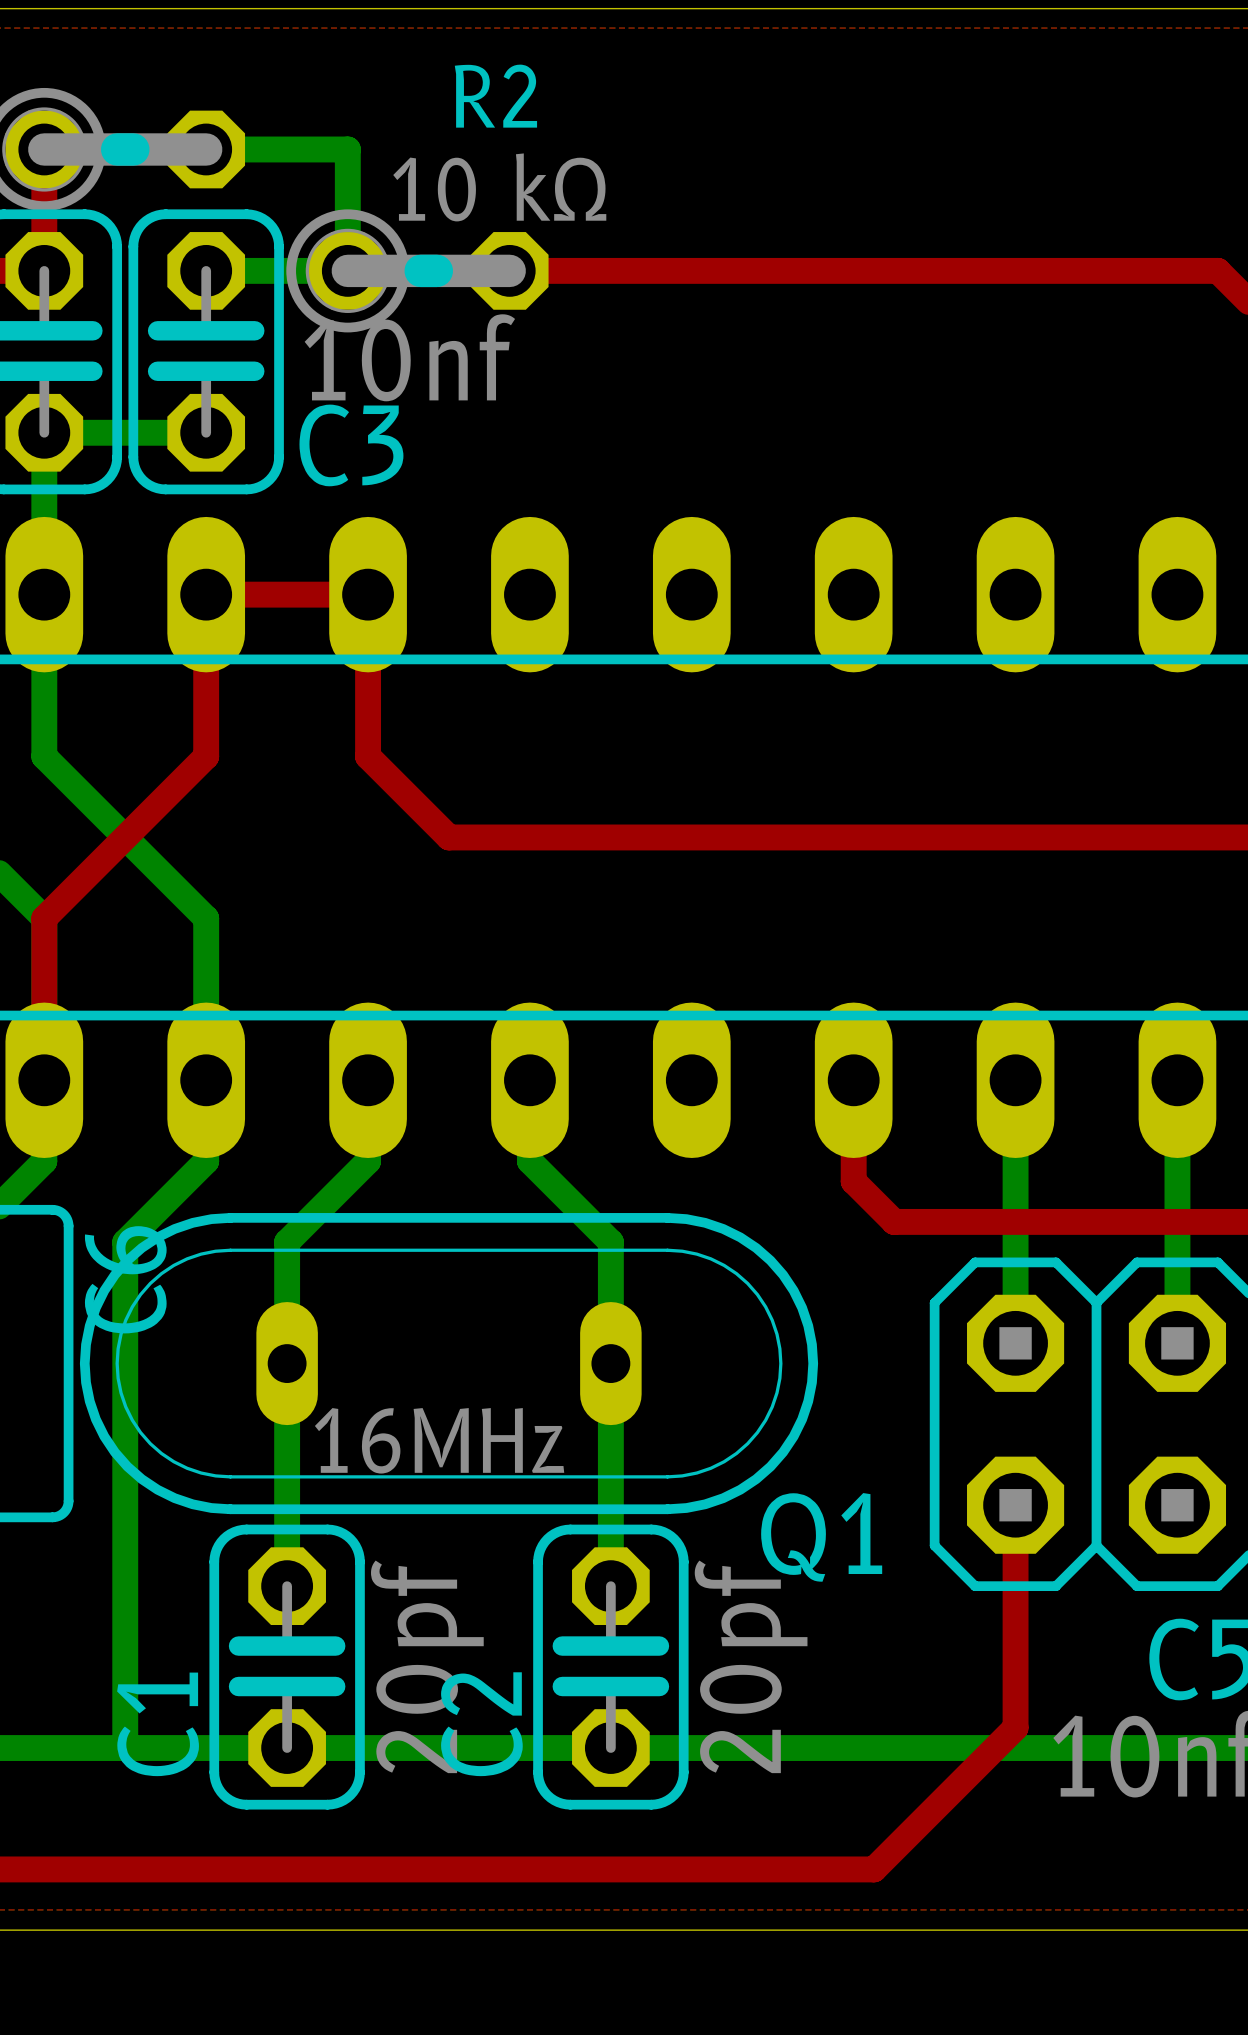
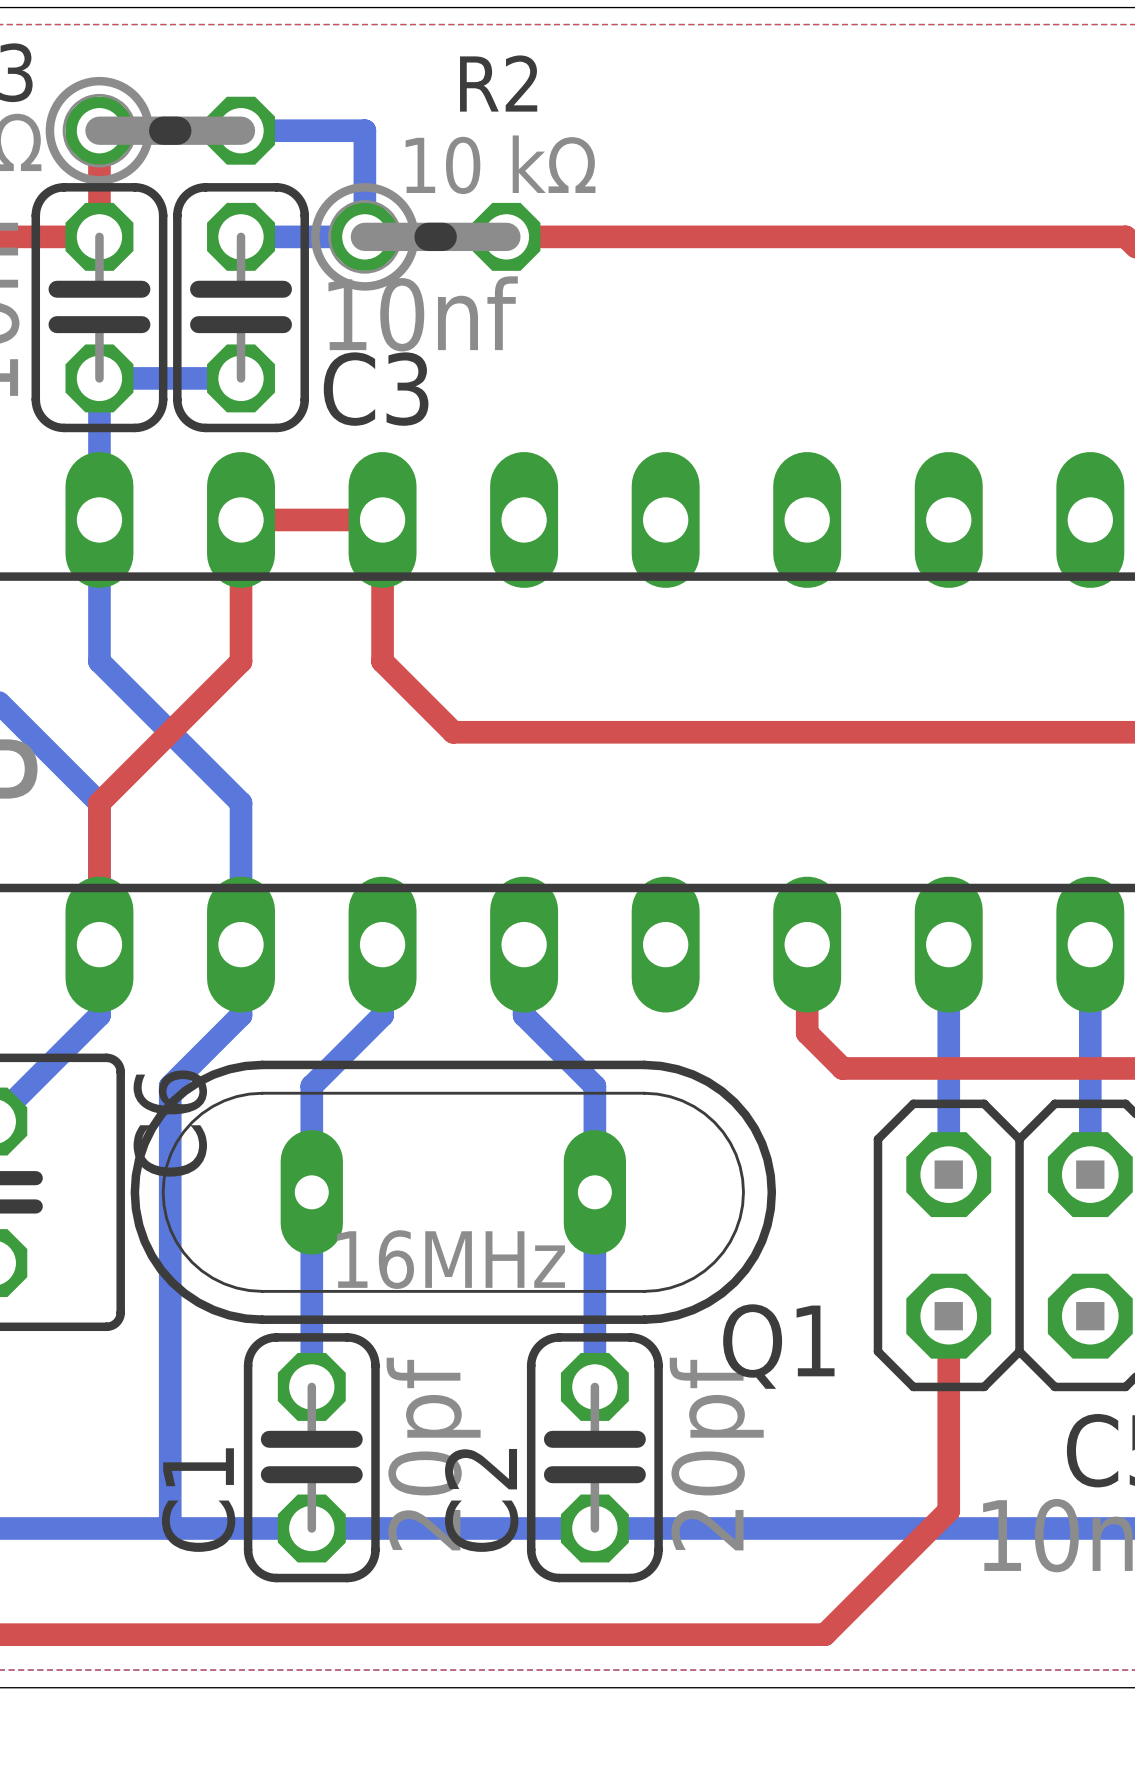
Q1 footprint: [79, 1213, 819, 1515] -> [130, 1060, 777, 1324]

